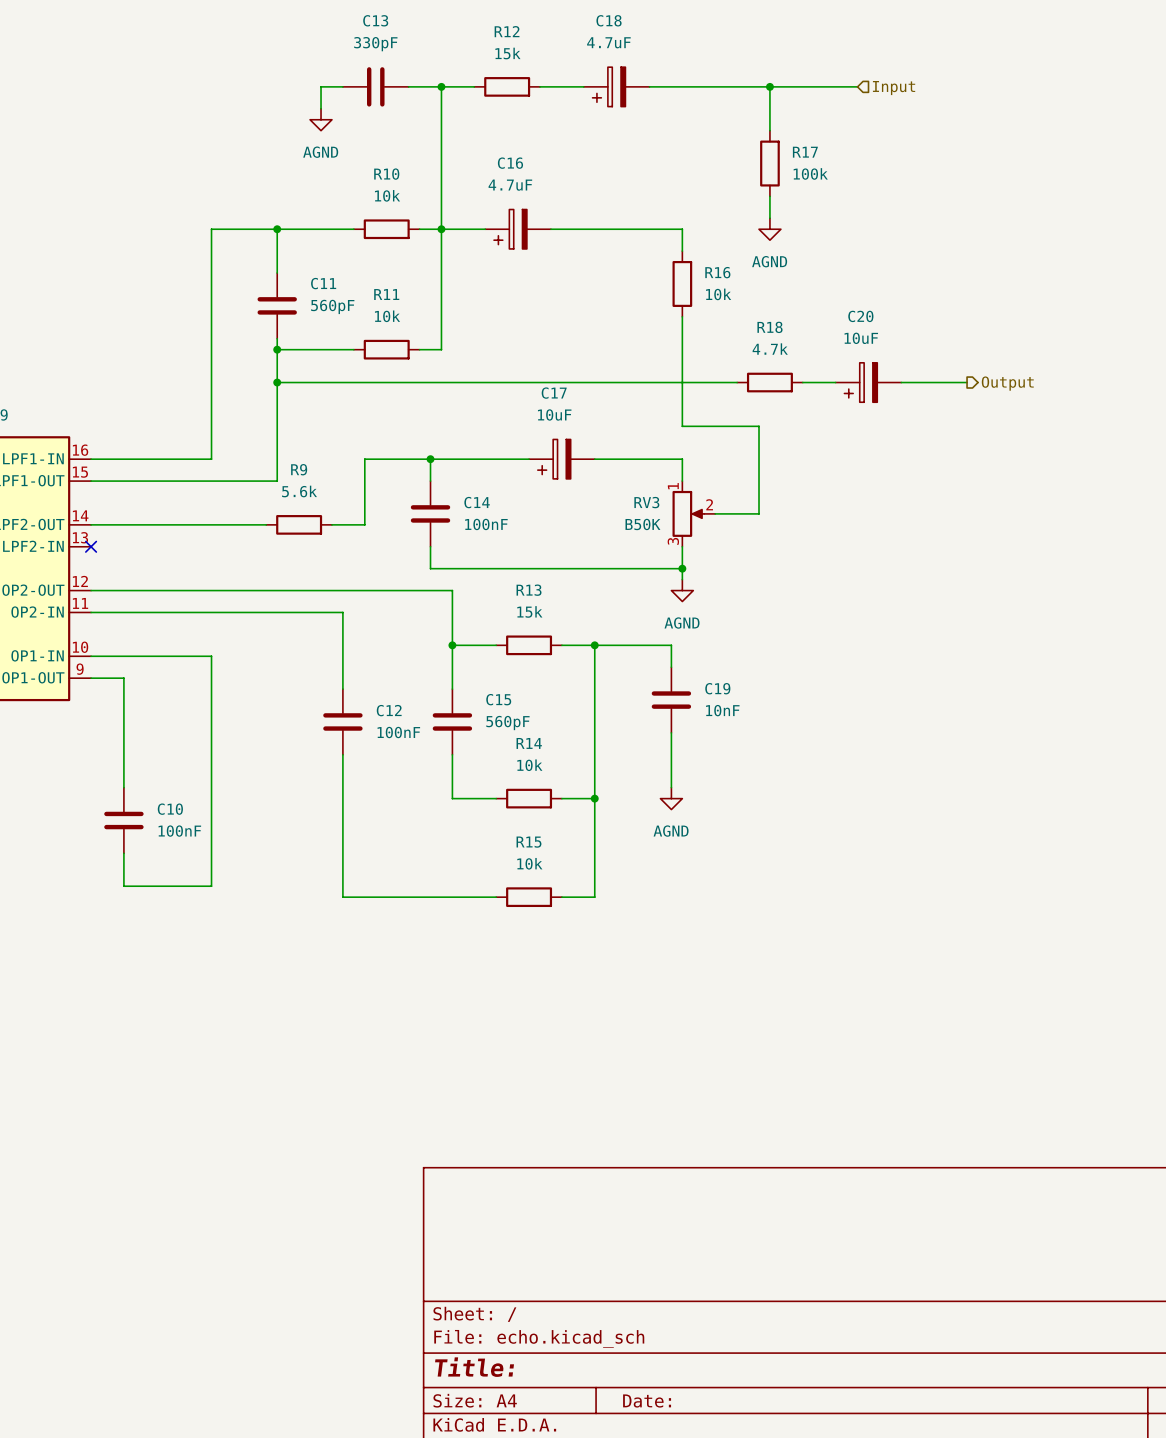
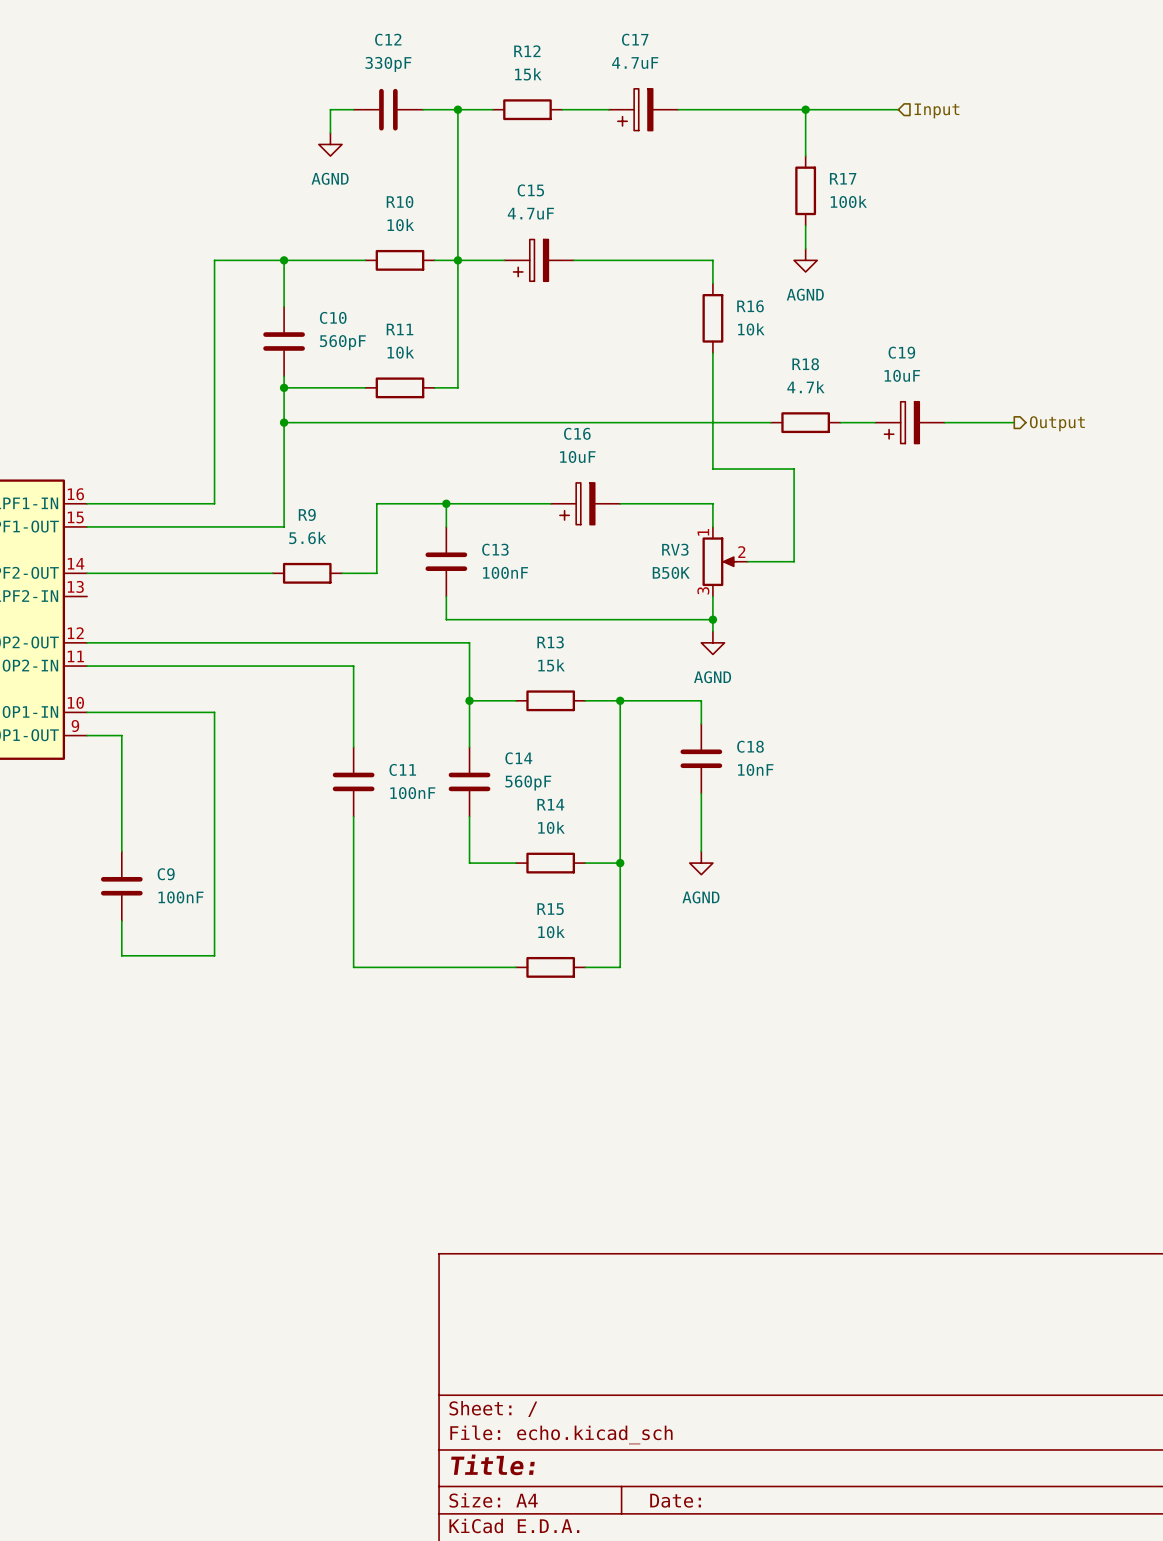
C13 name: C13 (375, 20) -> C12 (388, 39)
C18 name: C18 (609, 20) -> C17 (635, 39)
C16 name: C16 (510, 163) -> C15 (530, 190)
C11 name: C11 (323, 283) -> C10 (333, 317)
C20 name: C20 (860, 316) -> C19 (901, 352)
C17 name: C17 (554, 393) -> C16 (577, 433)
C14 name: C14 (477, 502) -> C13 (495, 549)
no-connect mark: (91, 546) -> none
C19 name: C19 (717, 688) -> C18 (750, 746)
C15 name: C15 (498, 699) -> C14 (518, 758)
C12 name: C12 (389, 710) -> C11 (402, 769)
C10 name: C10 (170, 809) -> C9 (166, 874)

